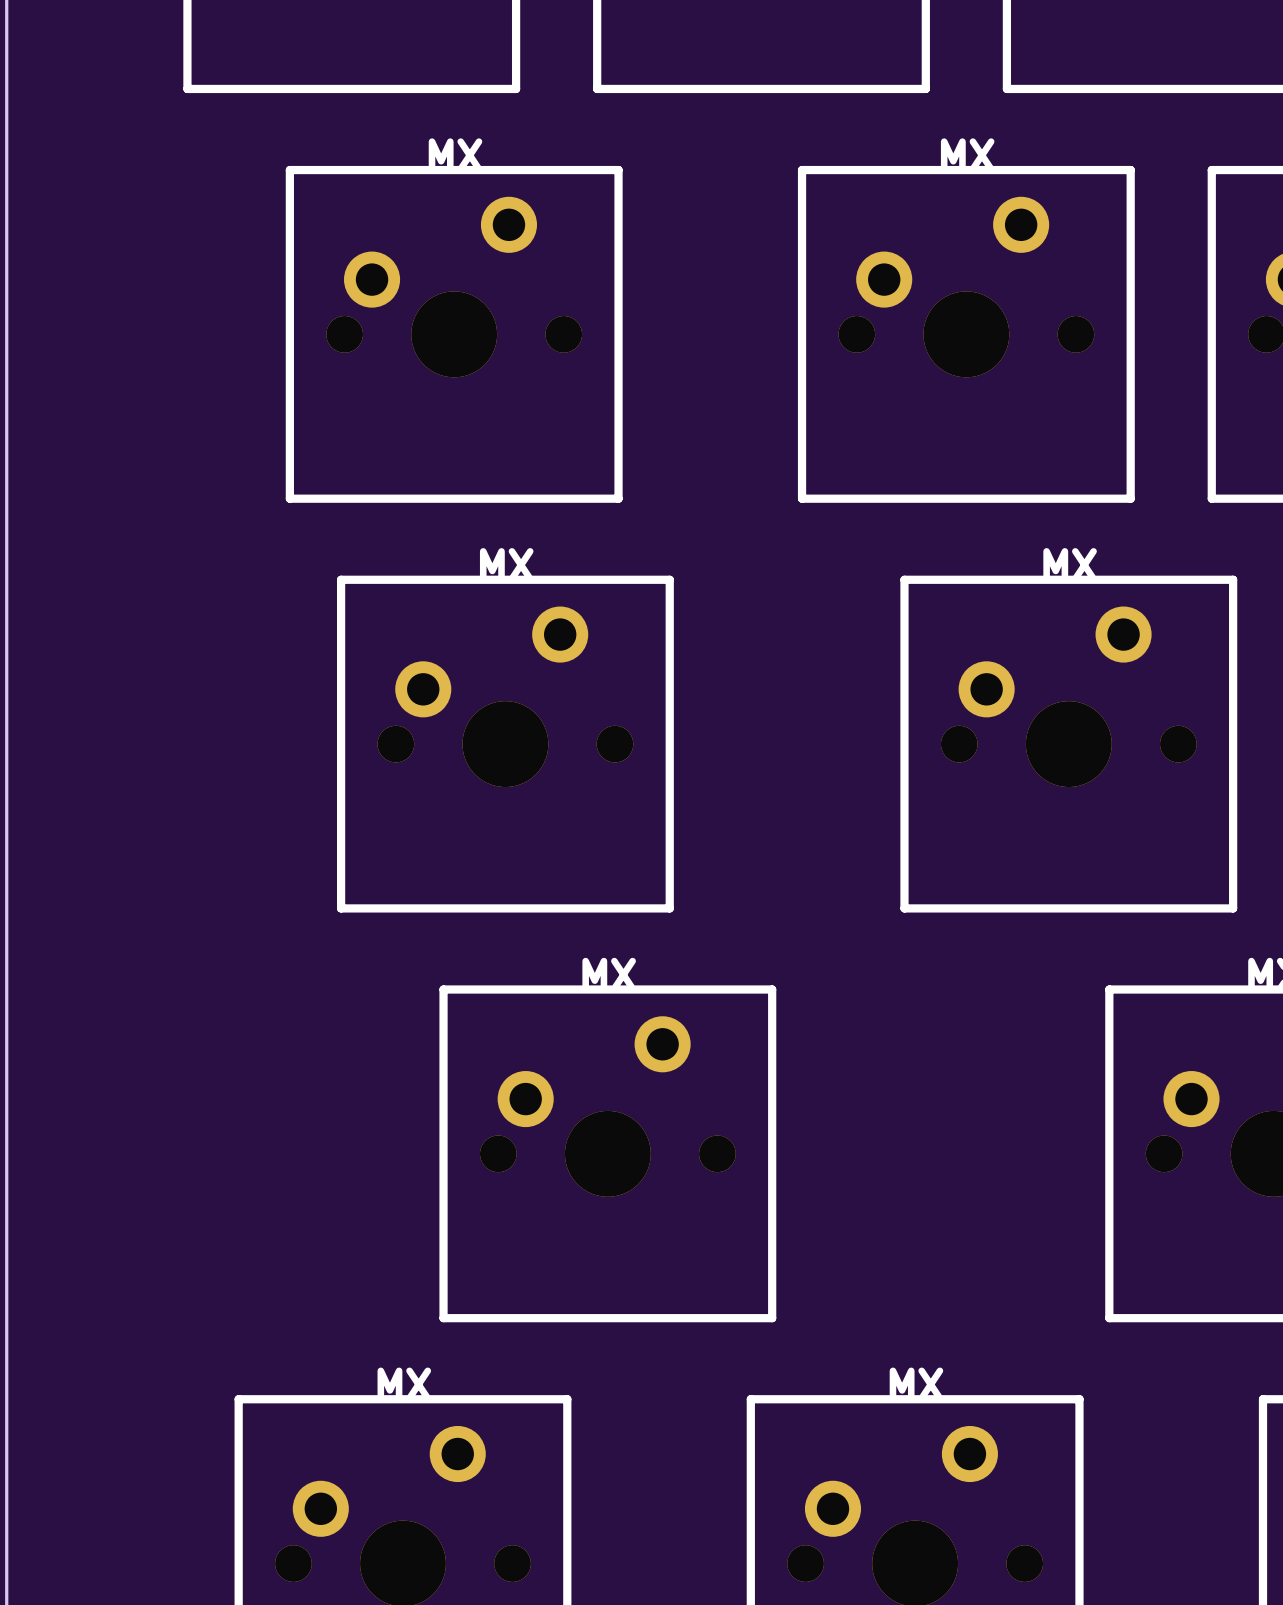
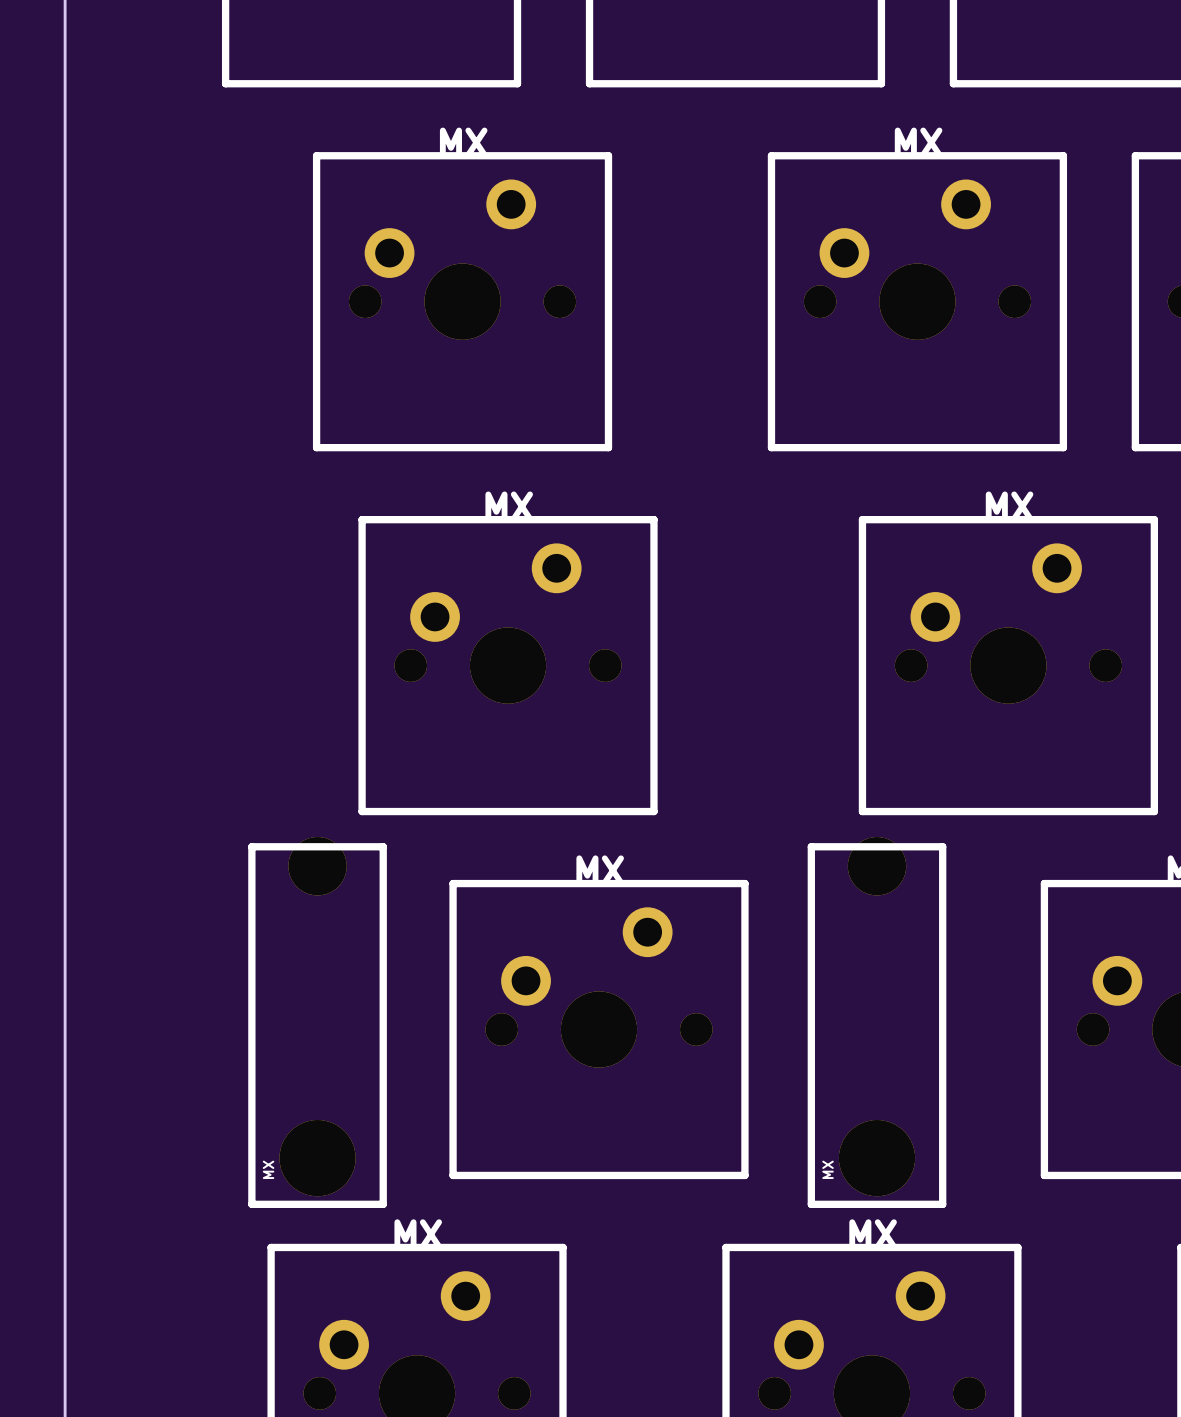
part: none -> MX (317, 1022)
part: none -> MX (877, 1022)

